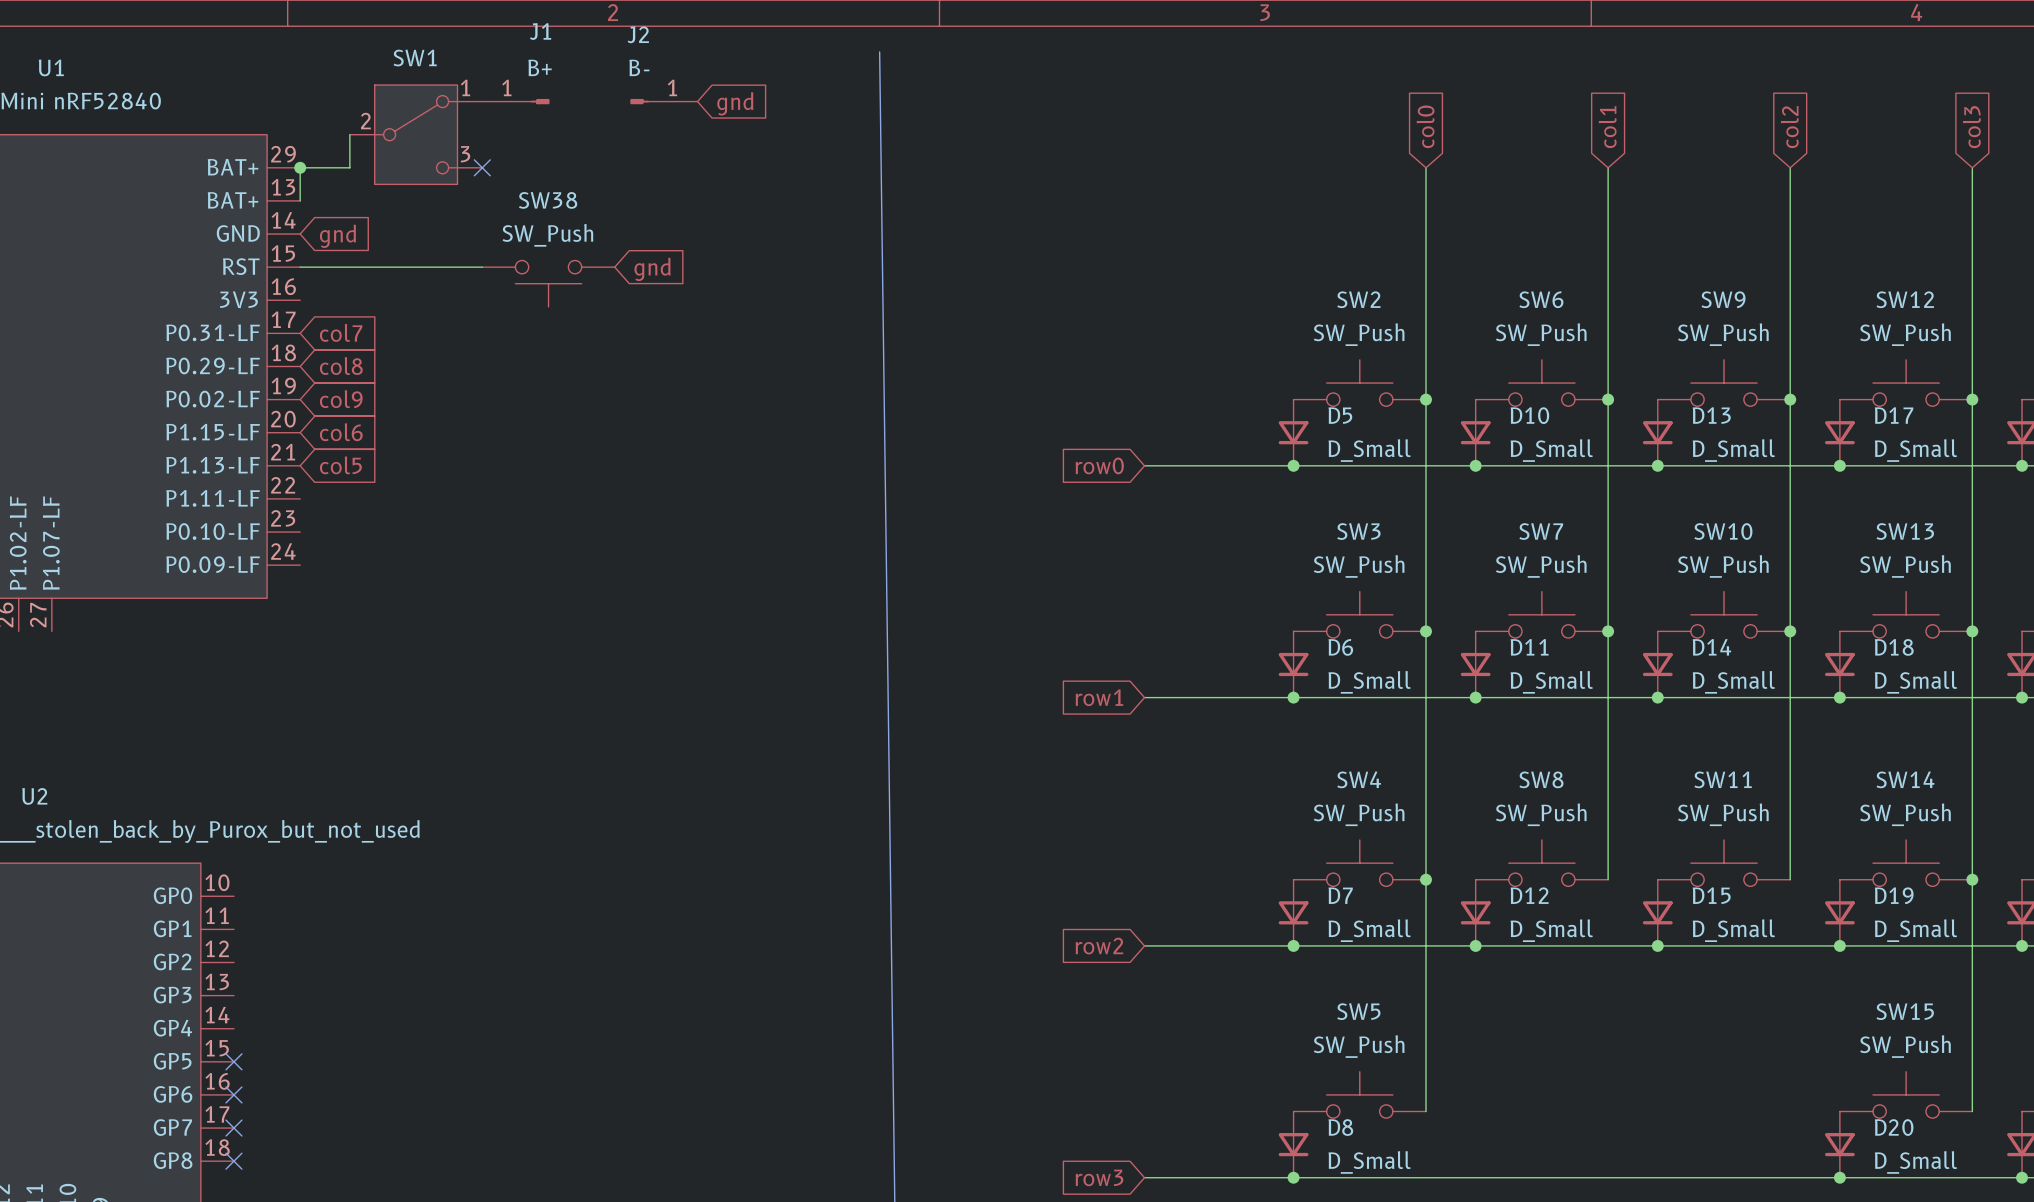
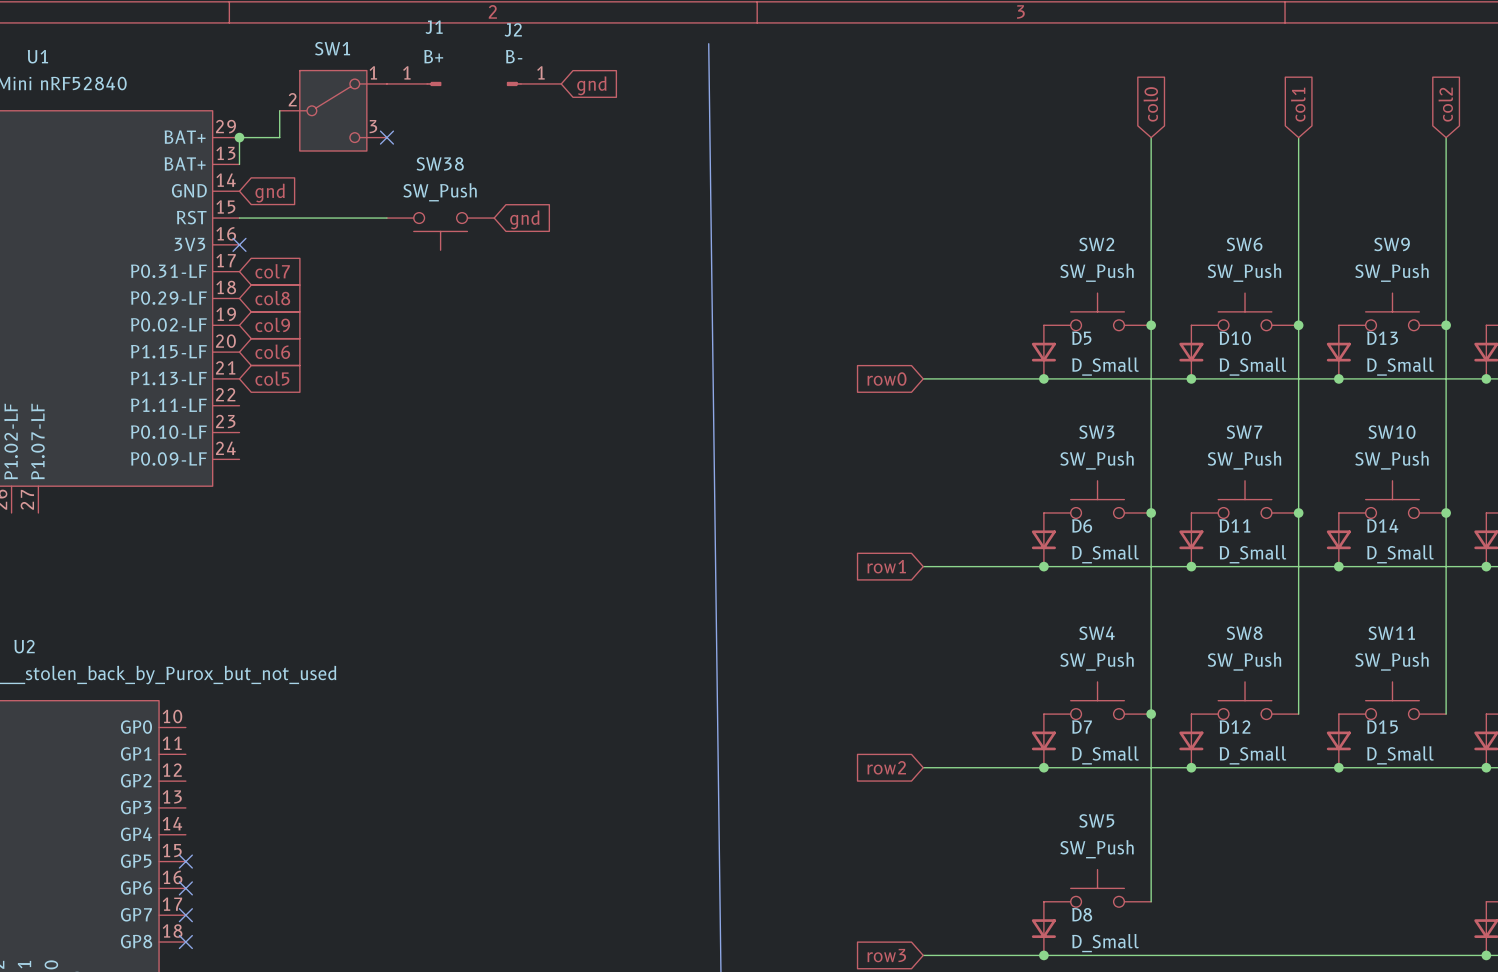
no-connect mark: none -> (239, 244)

